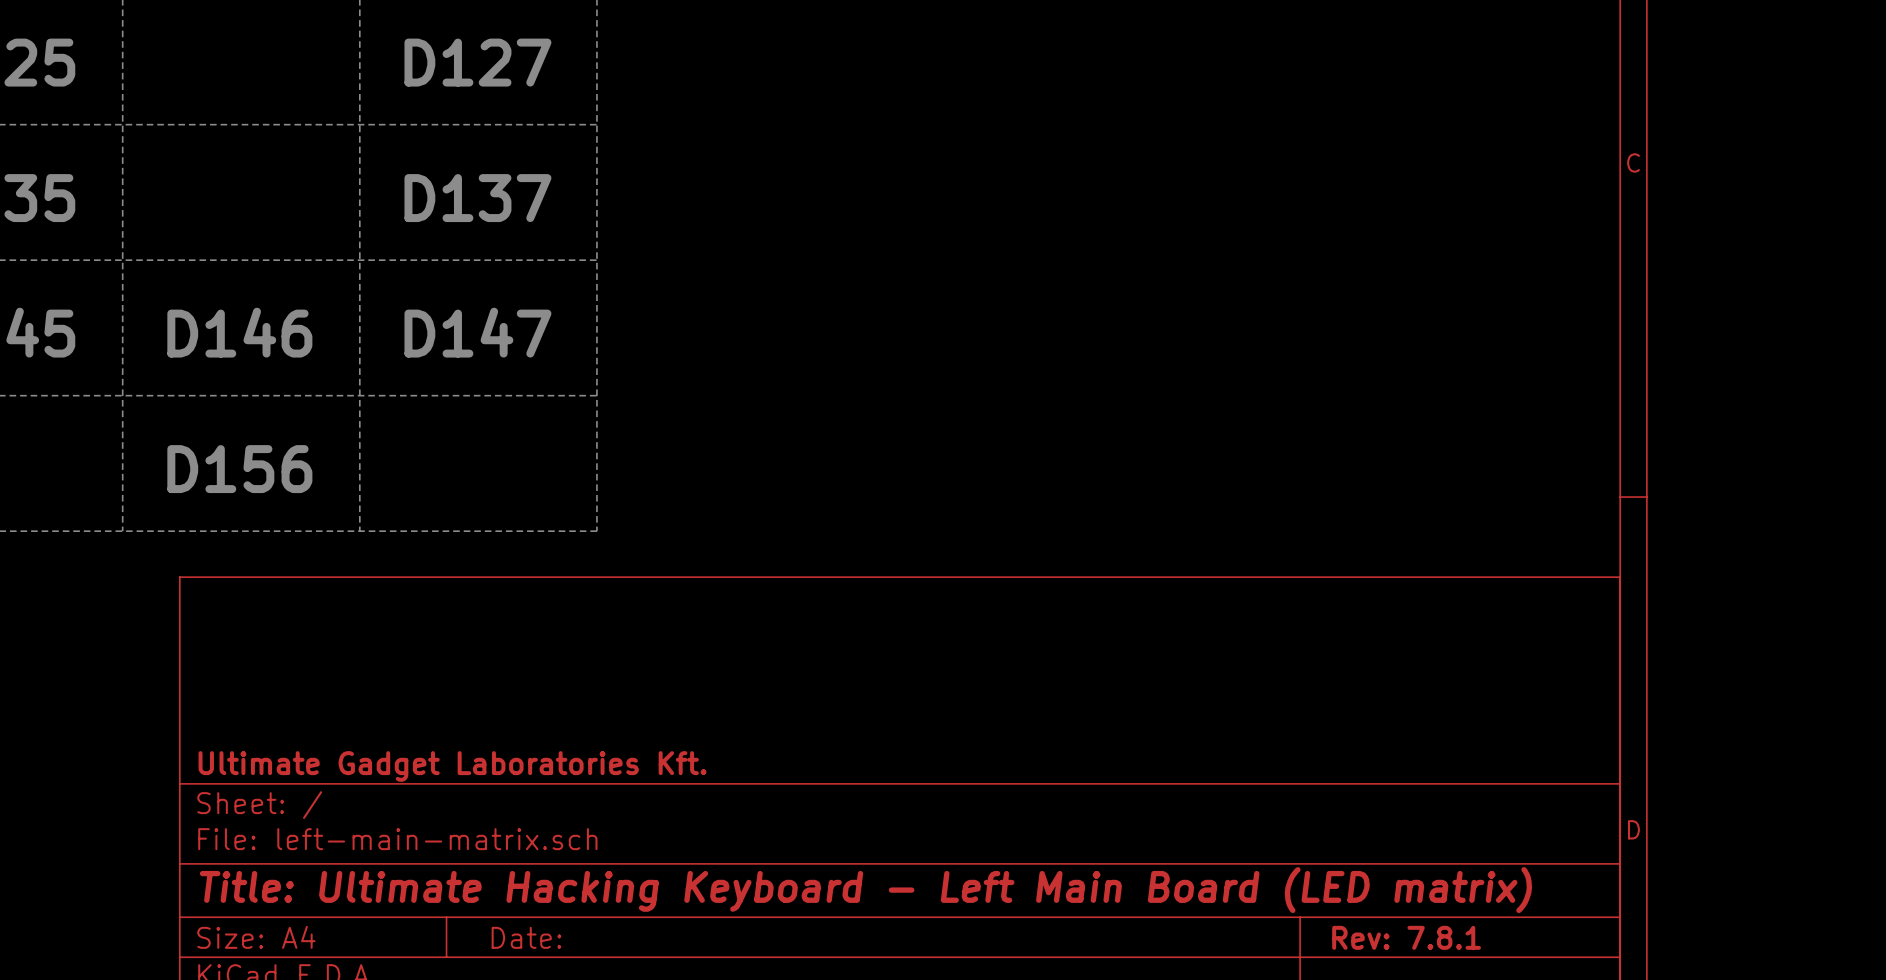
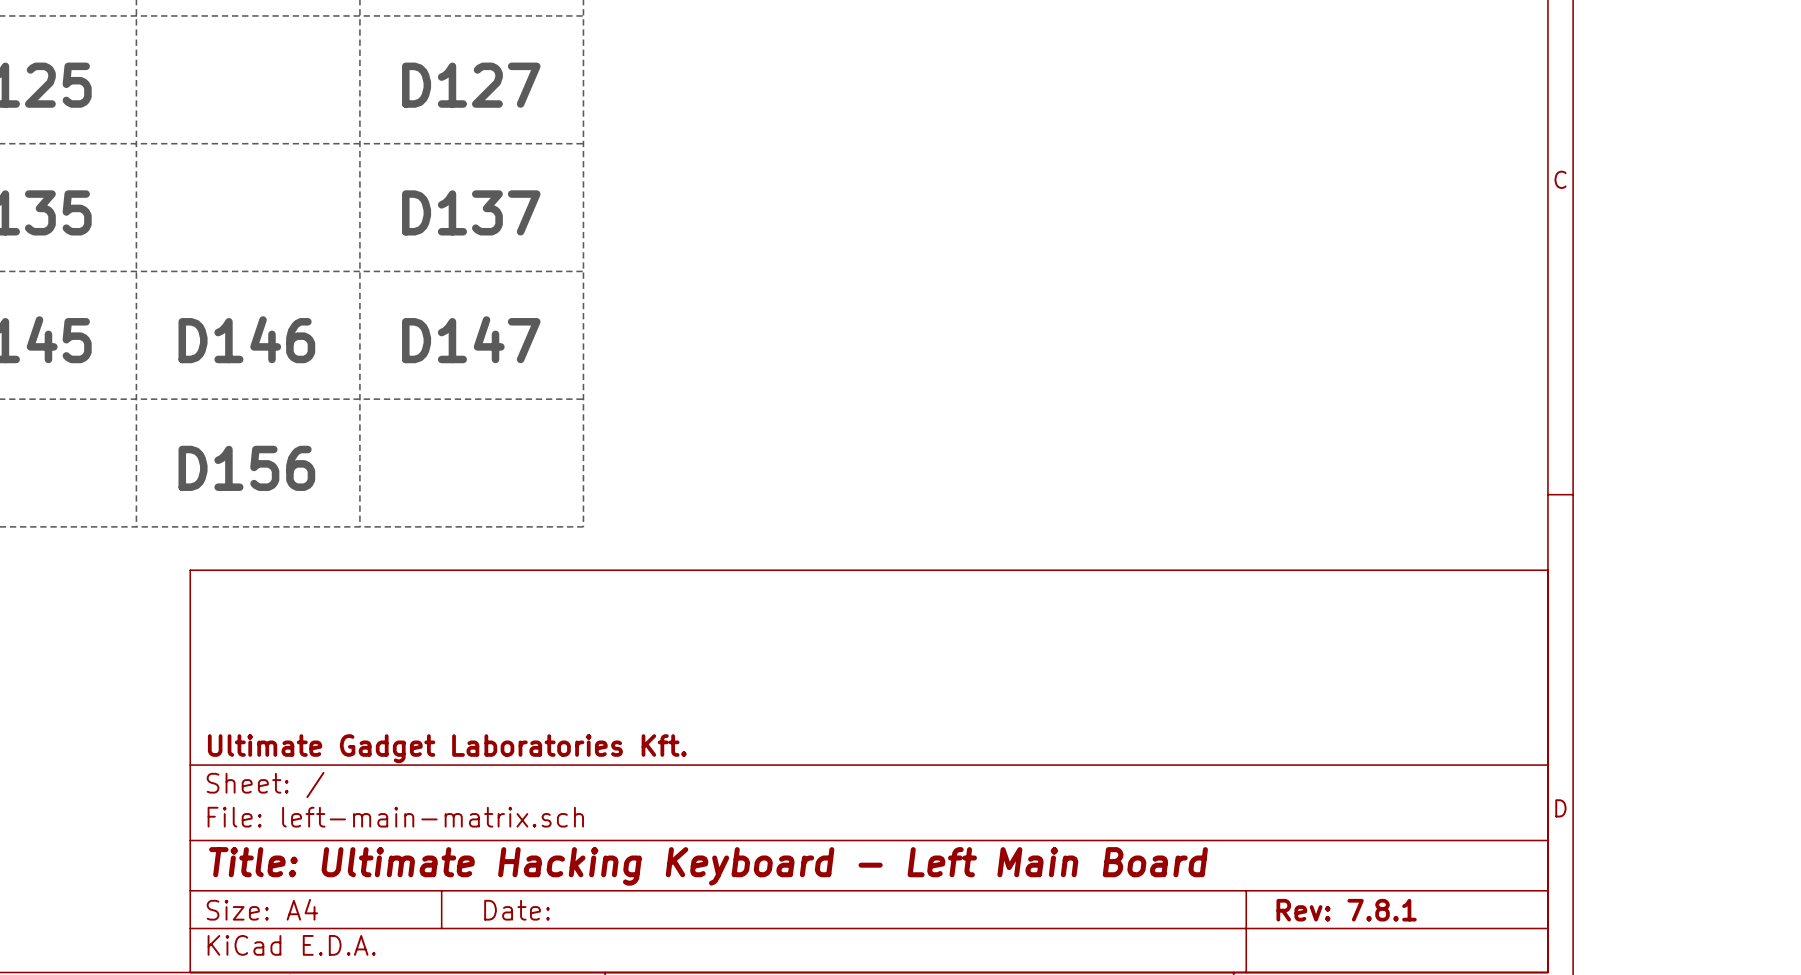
title block: Title: Ultimate Hacking Keyboard - Left Main Board (LED matrix) (865, 890) -> Title: Ultimate Hacking Keyboard - Left Main Board (708, 866)

